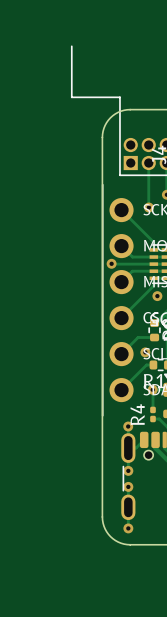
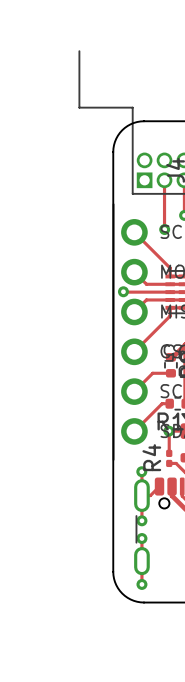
via: (157, 296) -> none
via: (145, 352) -> none

